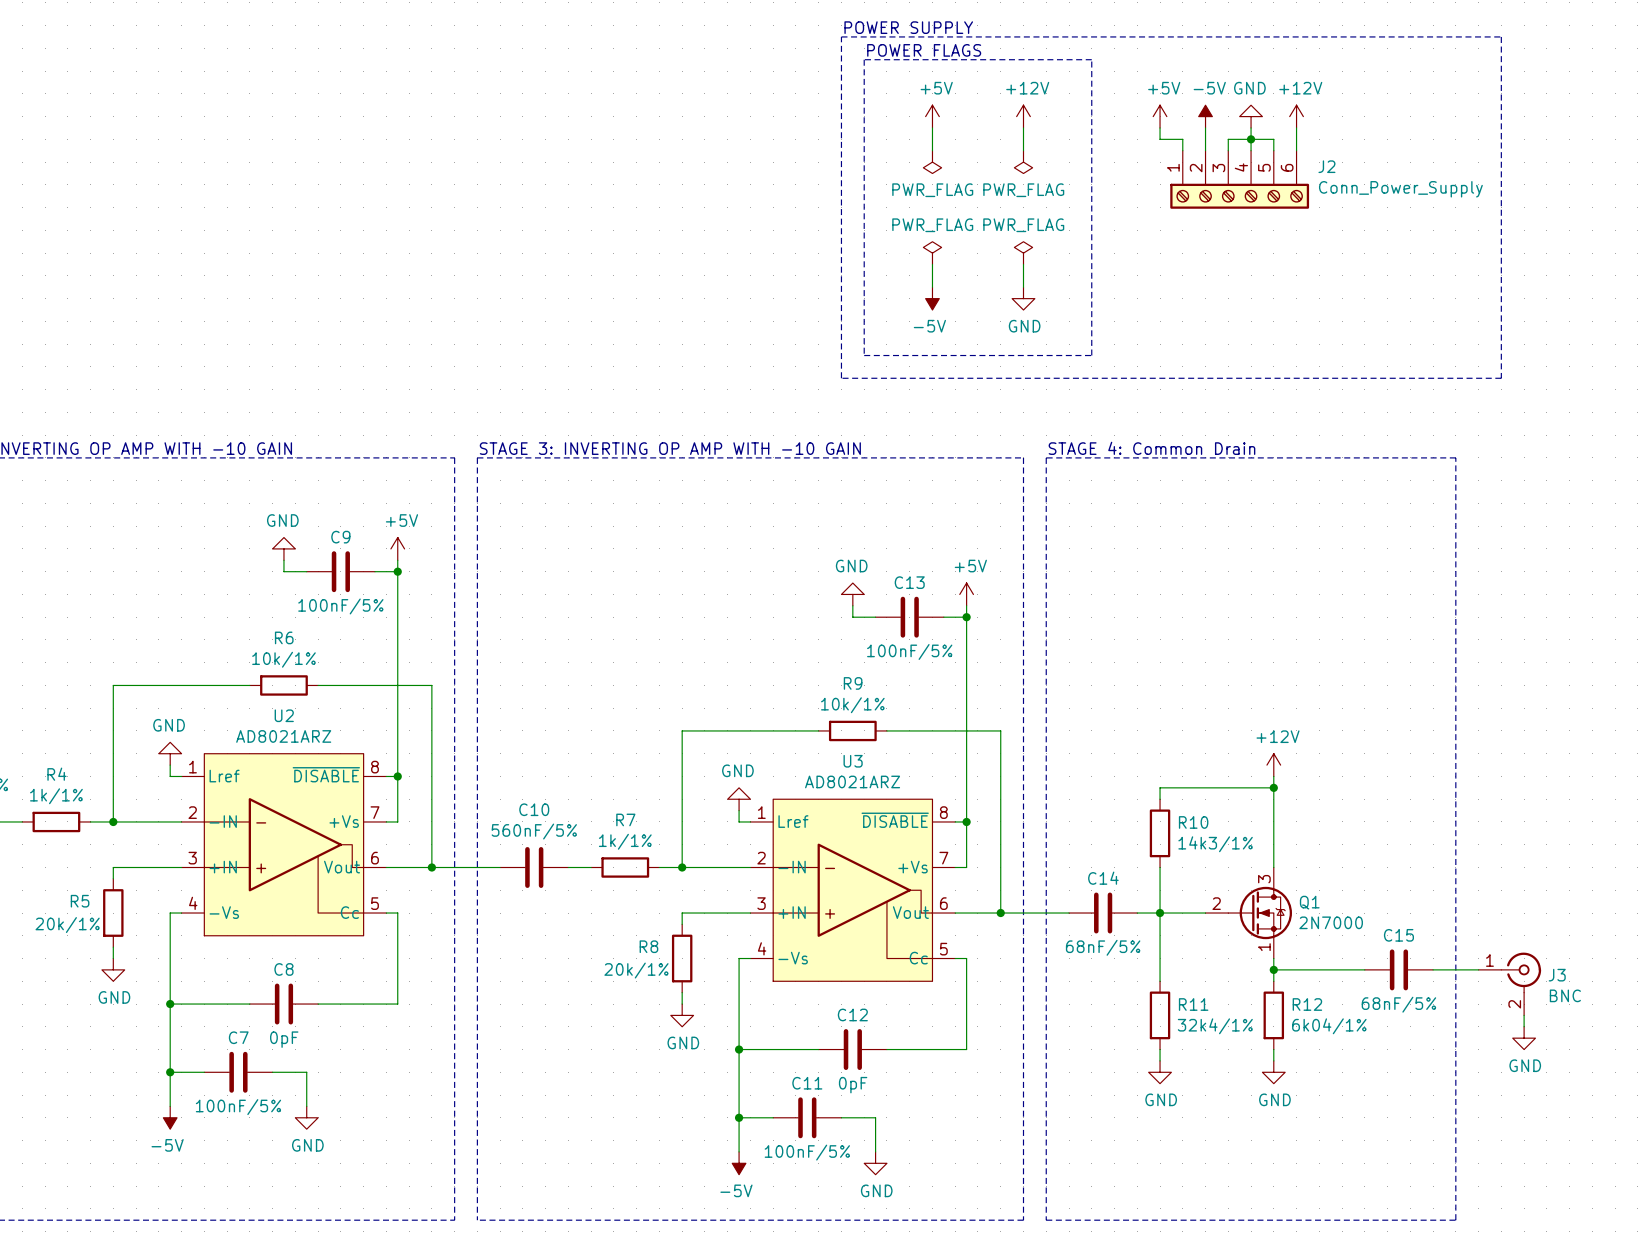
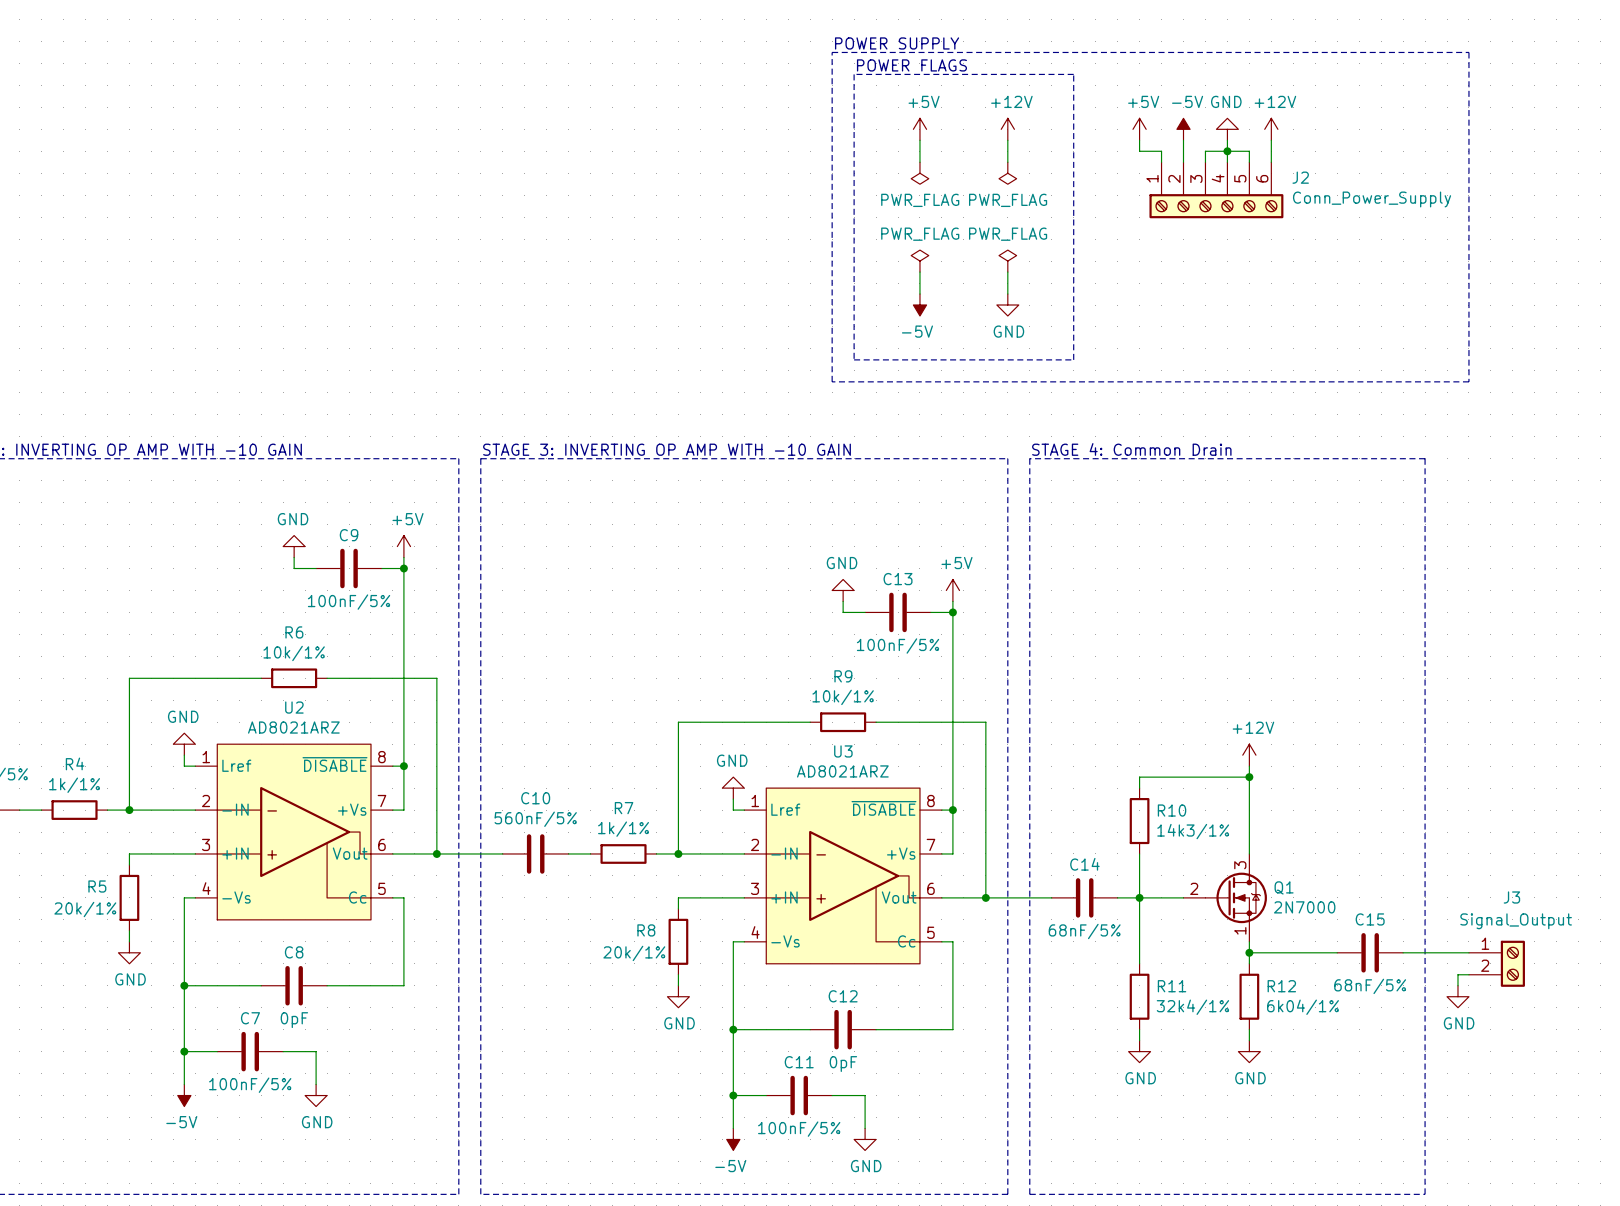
J3 symbol: [1478, 952, 1542, 1016] -> [1468, 940, 1525, 987]
J3 name position: J3 (1557, 975) -> J3 (1511, 897)
wire: none -> (1468, 974) (1457, 974) (1457, 985)
J3 value: BNC (1565, 995) -> Signal_Output (1516, 921)
wire: (1524, 1015) (1524, 1026) -> none
power symbol position: GND (1524, 1038) -> GND (1457, 996)

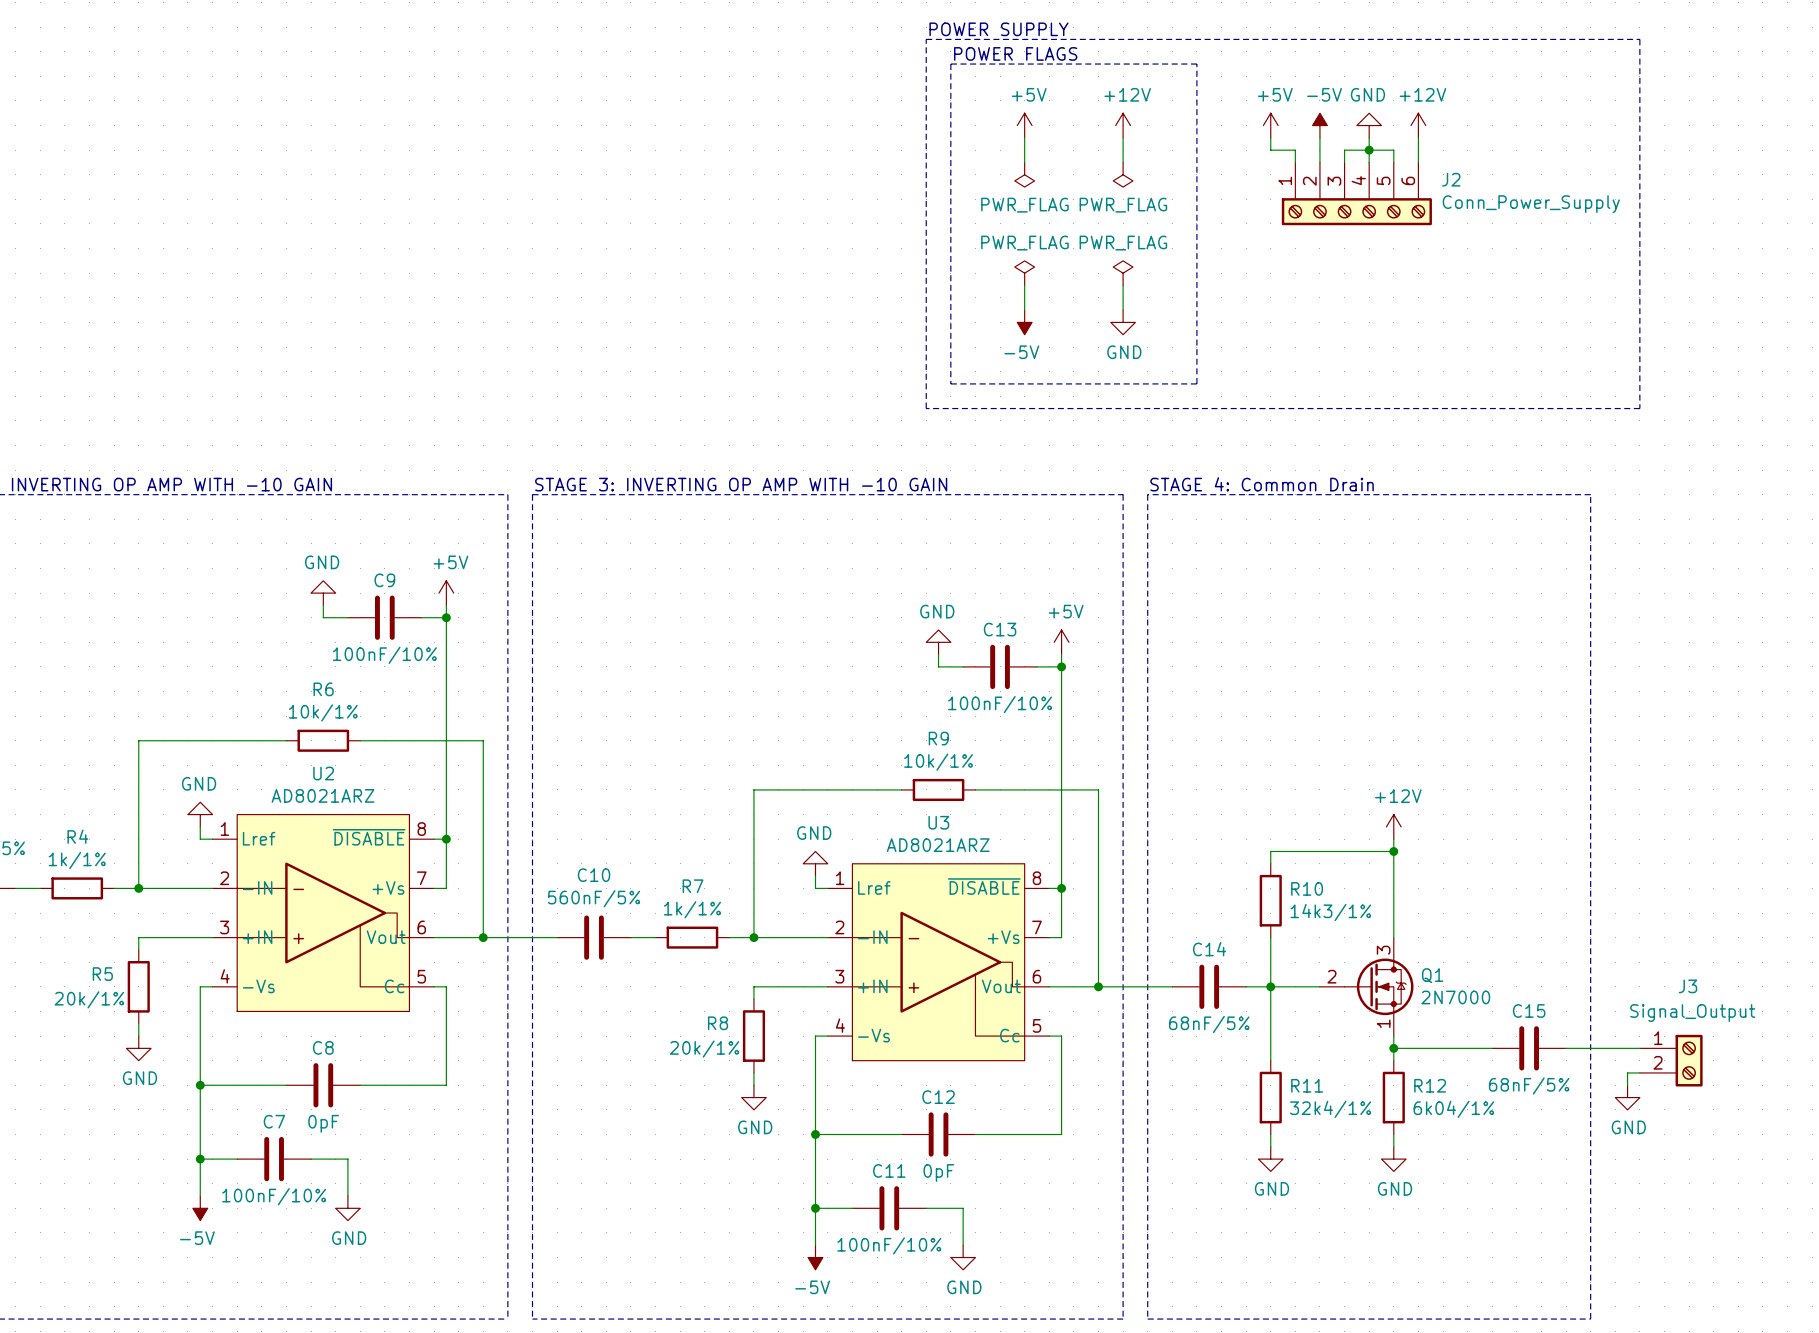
C9 value: 100nF/5% (349, 602) -> 100nF/10% (384, 655)
C13 value: 100nF/5% (898, 646) -> 100nF/10% (1000, 704)
C7 value: 100nF/5% (250, 1085) -> 100nF/10% (274, 1196)
C11 value: 100nF/5% (799, 1129) -> 100nF/10% (889, 1245)

